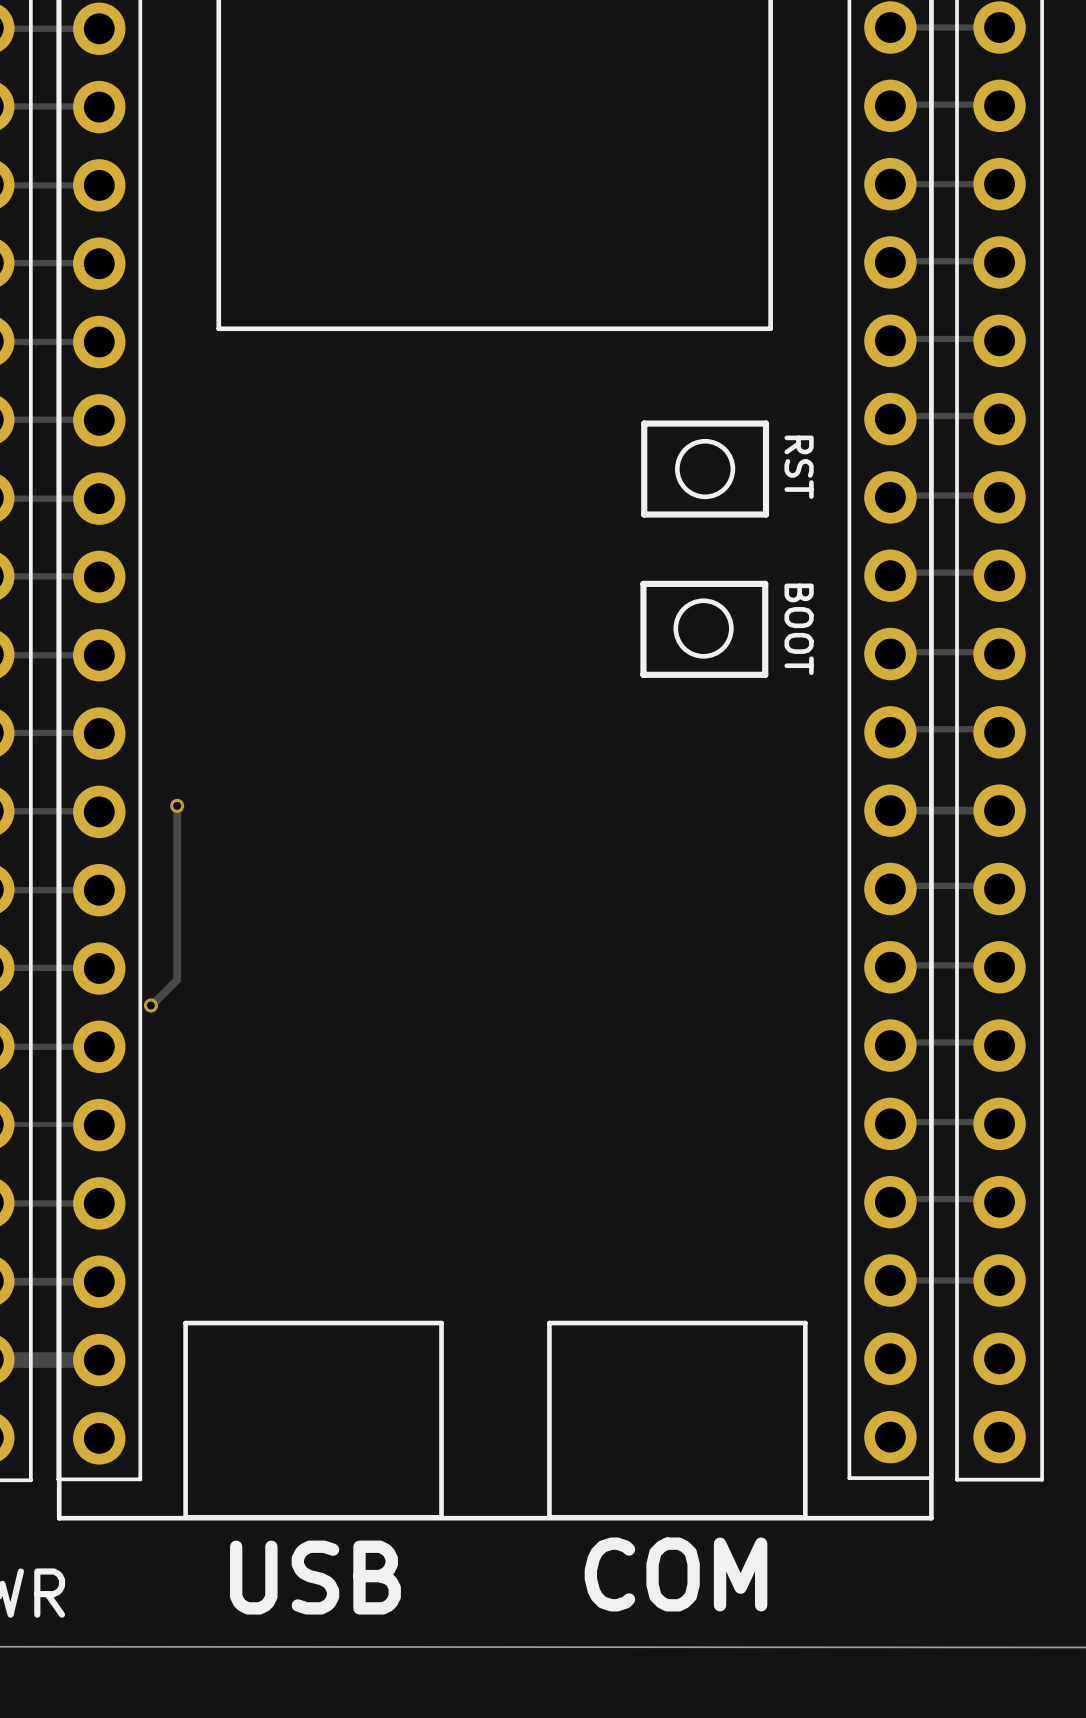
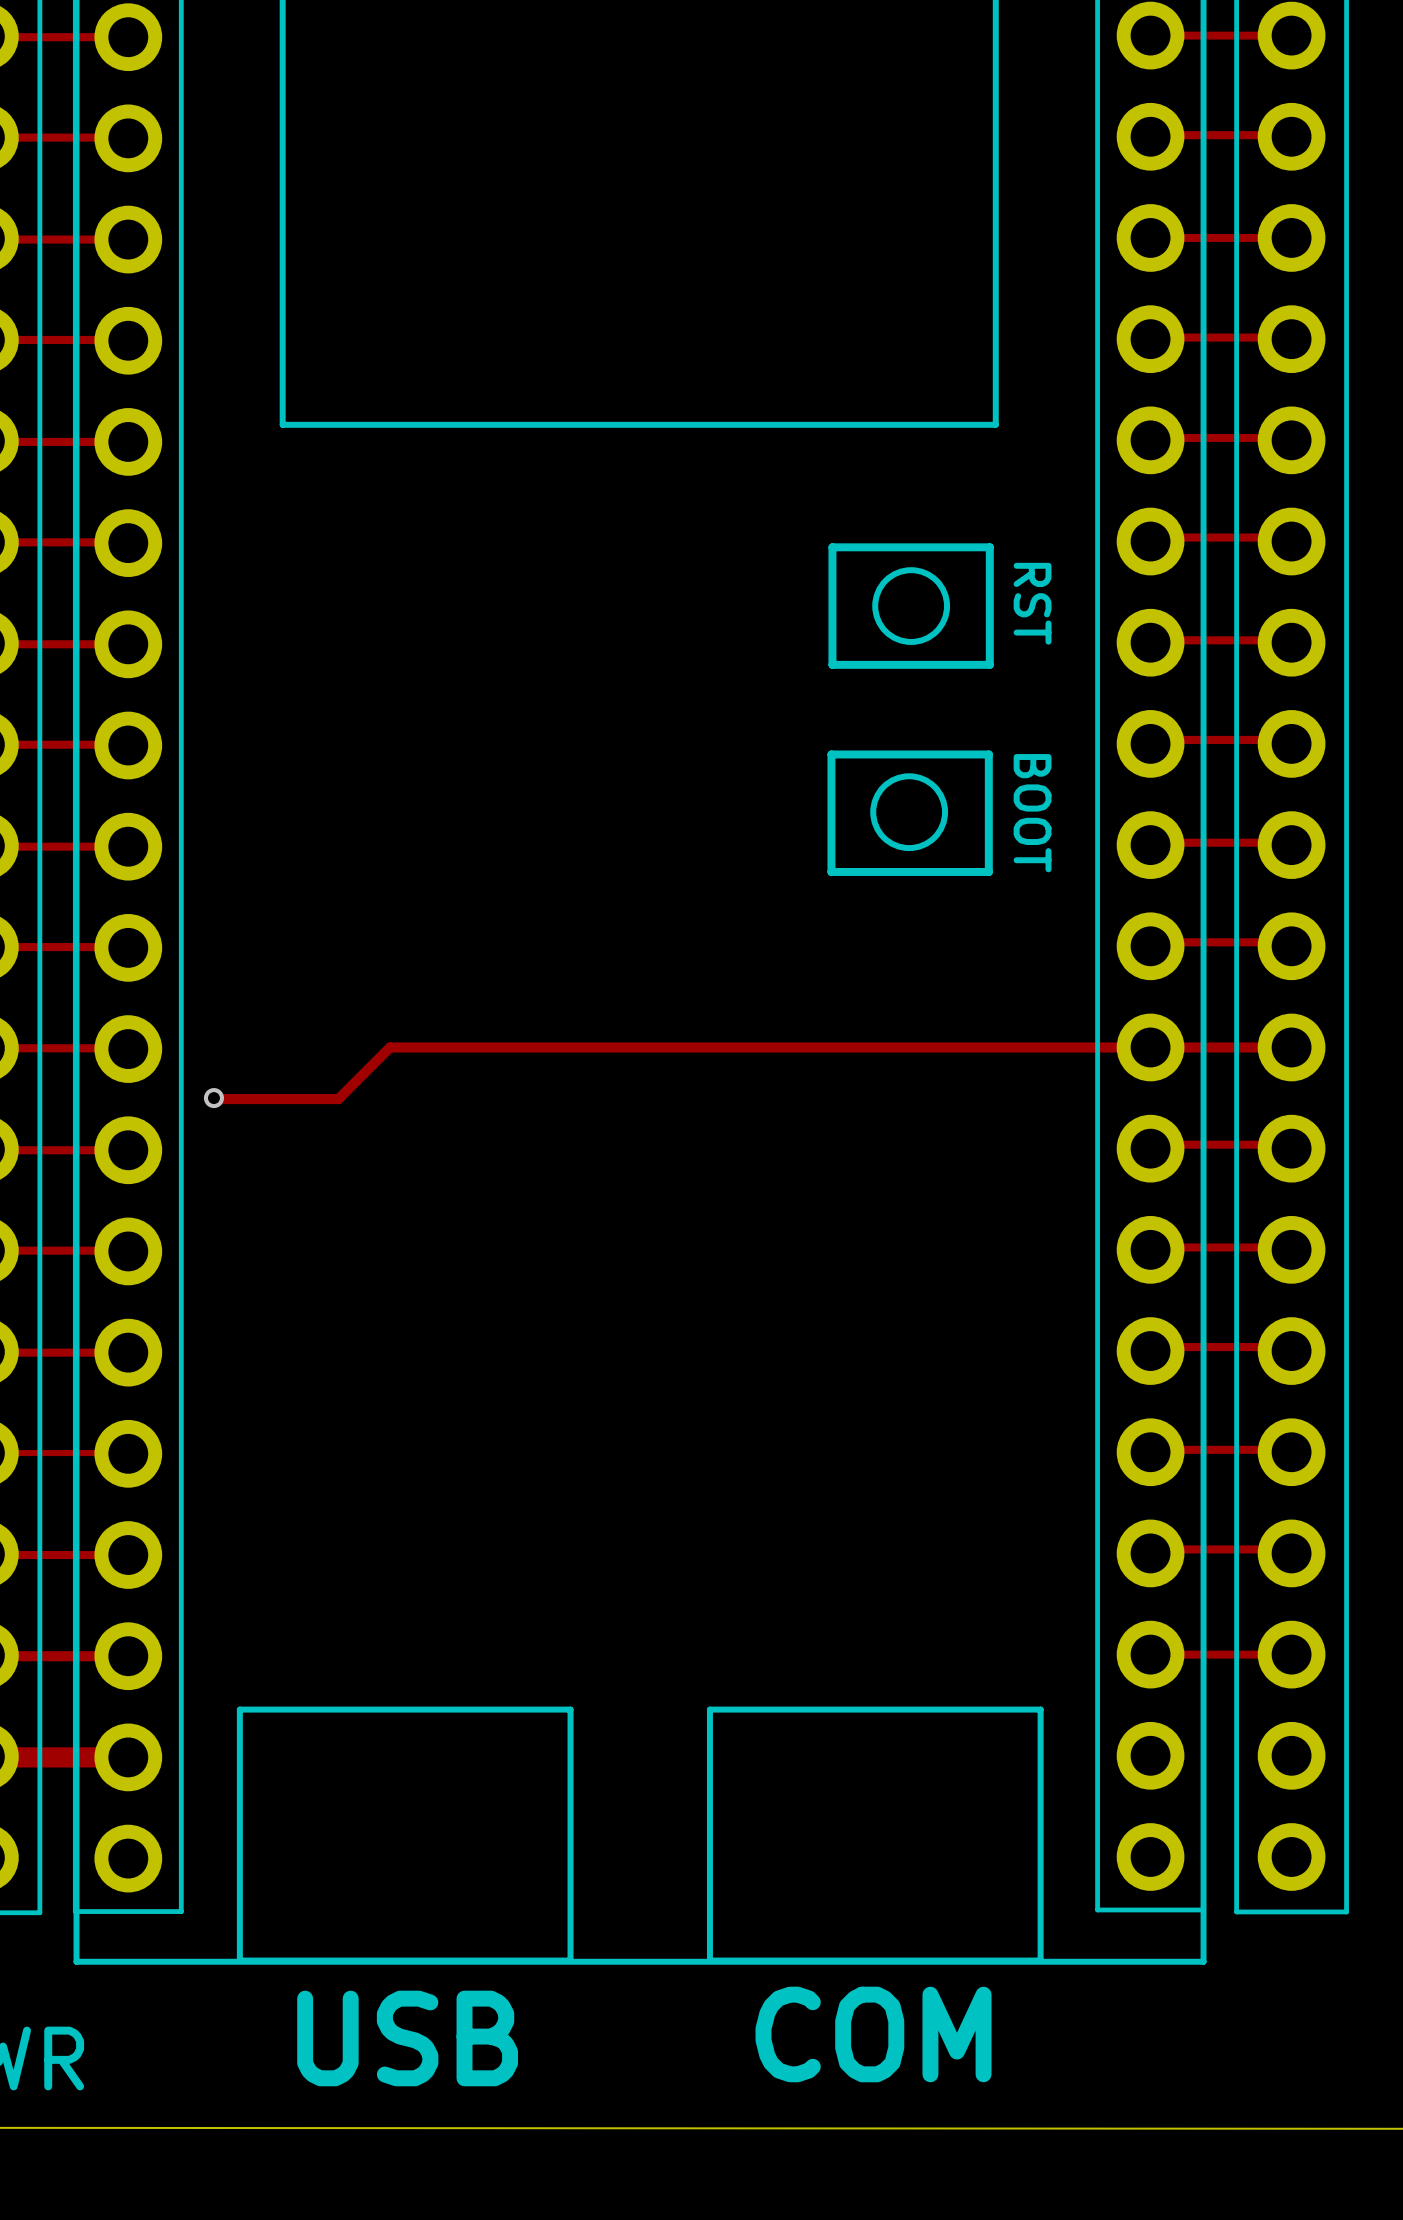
track: (177, 805) (177, 980) (152, 1004) -> none
via: (177, 805) -> none
track: none -> (1150, 1047) (390, 1047) (338, 1099) (213, 1098)
via: none -> (213, 1098)
via: (150, 1005) -> none

